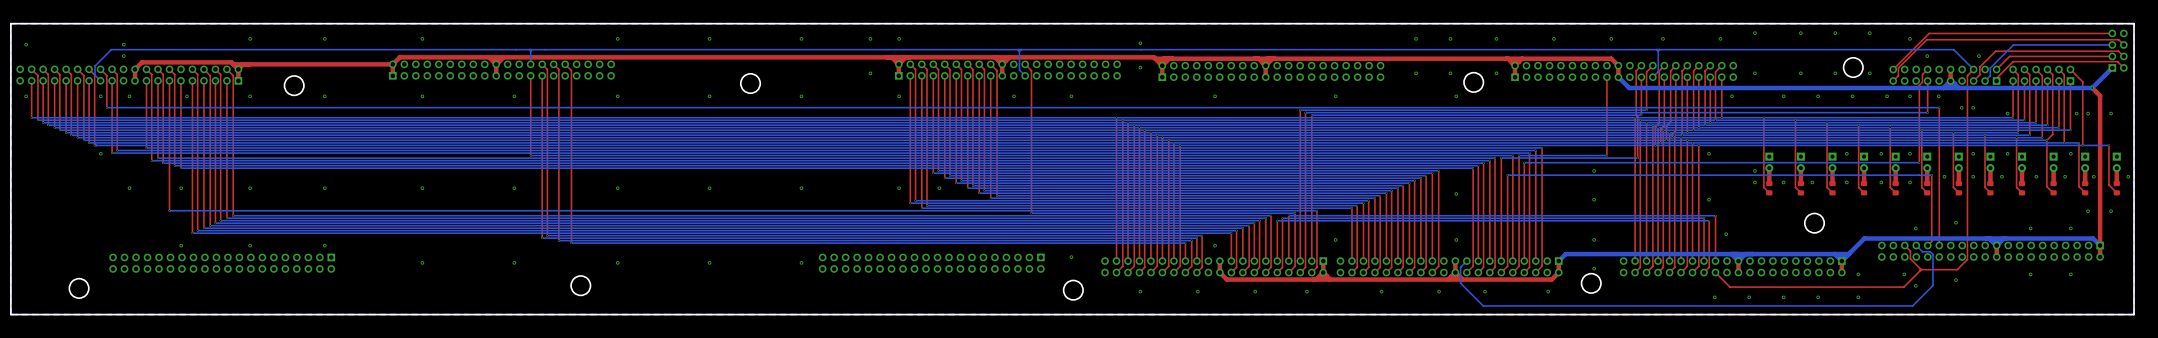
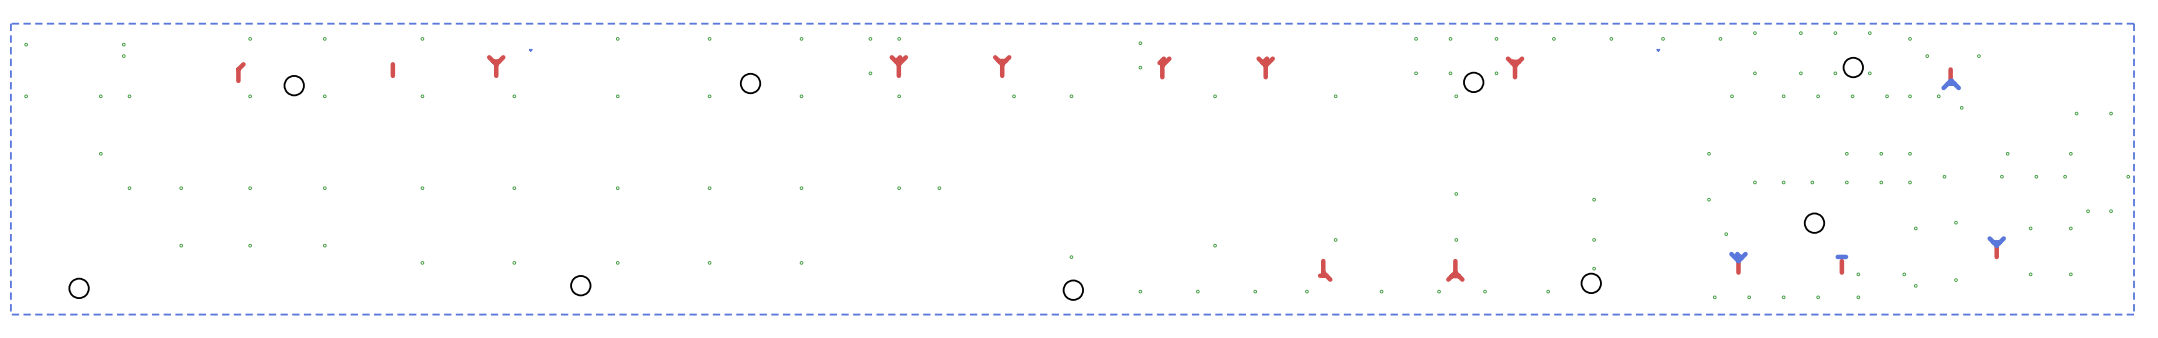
board edge: (2134, 23) (10, 23) (10, 314) (2134, 314) (2134, 23) -> none
top track: (2112, 33) (1929, 33) (1893, 69) -> none
bottom track: (2112, 44) (2013, 44) (1990, 68) (1990, 75) (1985, 80) -> none
top track: (2123, 44) (2118, 39) (1926, 39) (1898, 68) (1898, 75) (1893, 80) -> none
bottom track: (530, 49) (530, 64) -> none
bottom track: (1019, 49) (1019, 70) (1025, 75) -> none
bottom track: (1658, 49) (1658, 71) (1652, 77) -> none
part: (2118, 50) -> none
top track: (2112, 56) (2009, 56) (1996, 69) -> none
top track: (2123, 56) (2118, 51) (1995, 51) (1979, 67) (1979, 74) (1973, 80) -> none
top track: (1155, 58) (1611, 58) (1618, 65) (1618, 77) -> none
top track: (233, 64) (392, 64) (399, 57) (1153, 57) (1162, 65) -> none
top track: (542, 64) (547, 69) (547, 235) -> none
top track: (553, 64) (558, 69) (558, 240) -> none
top track: (565, 64) (571, 70) (571, 243) -> none
top track: (910, 64) (915, 69) (915, 200) -> none
top track: (921, 64) (927, 69) (927, 205) -> none
top track: (933, 64) (938, 69) (938, 170) -> none
top track: (944, 64) (949, 69) (949, 175) -> none
top track: (956, 64) (961, 69) (961, 180) -> none
top track: (967, 64) (972, 69) (972, 185) -> none
top track: (979, 64) (984, 69) (984, 190) -> none
top track: (990, 64) (997, 70) (997, 195) -> none
top track: (1025, 64) (1031, 70) (1031, 213) -> none
top track: (1641, 65) (1636, 70) (1637, 158) -> none
top track: (1652, 65) (1646, 71) (1646, 110) -> none
top track: (1664, 65) (1659, 70) (1659, 123) (1655, 126) (1655, 145) -> none
top track: (1675, 65) (1670, 70) (1670, 121) (1666, 126) (1666, 140) -> none
top track: (1687, 65) (1682, 70) (1682, 135) -> none
top track: (1698, 65) (1693, 70) (1693, 130) -> none
top track: (1710, 65) (1705, 70) (1705, 125) -> none
top track: (1721, 65) (1715, 71) (1715, 120) -> none
bottom track: (2112, 67) (2092, 88) (1629, 88) (1618, 77) -> none
top track: (2123, 67) (2117, 61) (2013, 61) (1996, 78) (1996, 80) -> none
top track: (31, 69) (37, 75) (37, 120) -> none
top track: (43, 69) (48, 74) (48, 125) -> none
top track: (54, 69) (59, 74) (59, 130) -> none
top track: (66, 69) (71, 74) (71, 135) -> none
top track: (77, 69) (83, 75) (83, 140) -> none
top track: (89, 69) (94, 74) (94, 145) -> none
top track: (100, 69) (106, 75) (106, 107) -> none
top track: (112, 69) (117, 74) (117, 150) -> none
top track: (146, 69) (151, 74) (151, 160) -> none
top track: (158, 69) (163, 74) (163, 163) -> none
top track: (169, 69) (174, 74) (174, 165) -> none
top track: (192, 69) (197, 74) (197, 230) -> none
top track: (203, 69) (210, 75) (210, 225) -> none
top track: (215, 69) (220, 74) (220, 220) -> none
top track: (226, 69) (233, 75) (233, 215) -> none
top track: (238, 69) (231, 62) (142, 62) (135, 69) (135, 80) -> none
top track: (1927, 69) (1922, 74) (1922, 82) (1919, 85) (1919, 162) -> none
top track: (1973, 69) (1967, 75) (1967, 259) (1957, 269) (1921, 269) -> none
bottom track: (1973, 69) (1953, 49) (111, 49) (95, 66) (95, 75) (100, 80) -> none
top track: (2013, 69) (2018, 74) (2018, 132) -> none
top track: (2024, 69) (2029, 74) (2029, 135) -> none
top track: (2036, 69) (2042, 75) (2042, 137) -> none
top track: (2047, 69) (2052, 74) (2052, 134) (2046, 140) (2046, 186) (2053, 192) -> none
top track: (2058, 69) (2064, 74) (2064, 142) -> none
top track: (2070, 69) (2082, 81) (2082, 145) -> none
part: (501, 70) -> none
part: (1007, 70) -> none
part: (1271, 71) -> none
part: (1624, 71) -> none
part: (129, 75) -> none
top track: (530, 75) (530, 155) -> none
top track: (542, 75) (542, 238) -> none
top track: (910, 75) (910, 203) -> none
top track: (921, 75) (921, 208) -> none
top track: (933, 75) (933, 173) -> none
top track: (944, 75) (944, 178) -> none
top track: (956, 75) (956, 183) -> none
top track: (967, 75) (967, 188) -> none
top track: (979, 75) (979, 193) -> none
top track: (990, 75) (990, 198) -> none
part: (1944, 75) -> none
part: (2041, 75) -> none
top track: (1606, 77) (1606, 155) -> none
top track: (1641, 77) (1641, 115) -> none
top track: (1664, 77) (1664, 125) (1660, 129) (1660, 142) -> none
top track: (1675, 77) (1675, 130) (1672, 134) (1672, 137) -> none
top track: (1687, 77) (1687, 132) -> none
top track: (1698, 77) (1698, 127) -> none
top track: (1710, 77) (1710, 122) -> none
top track: (1721, 77) (1721, 117) -> none
top track: (31, 80) (31, 117) -> none
top track: (43, 80) (43, 122) -> none
top track: (54, 80) (54, 127) -> none
top track: (66, 80) (66, 132) -> none
top track: (77, 80) (77, 137) -> none
top track: (89, 80) (89, 142) -> none
top track: (112, 80) (112, 153) -> none
top track: (146, 80) (146, 147) -> none
top track: (158, 80) (158, 158) -> none
top track: (169, 80) (169, 210) -> none
top track: (180, 80) (180, 168) -> none
top track: (192, 80) (192, 233) -> none
top track: (203, 80) (203, 228) -> none
top track: (215, 80) (215, 223) -> none
top track: (226, 80) (226, 218) -> none
top track: (1927, 80) (1927, 112) -> none
top track: (2013, 80) (2013, 117) -> none
top track: (2024, 80) (2024, 120) -> none
top track: (2036, 80) (2036, 122) -> none
top track: (2047, 80) (2047, 125) -> none
top track: (2058, 80) (2058, 127) -> none
top track: (2070, 80) (2070, 130) -> none
top track: (2092, 88) (2100, 95) (2100, 257) -> none
via: (2092, 88) -> none
via: (186, 96) -> none
via: (106, 107) -> none
top track: (1939, 107) (1939, 245) -> none
bottom track: (1939, 107) (106, 107) -> none
via: (1939, 107) -> none
via: (1973, 107) -> none
top track: (1300, 110) (1300, 261) -> none
via: (1300, 110) -> none
bottom track: (1646, 110) (1300, 110) -> none
via: (1646, 110) -> none
top track: (1305, 112) (1305, 267) (1300, 272) -> none
via: (1305, 112) -> none
bottom track: (1927, 112) (1305, 112) -> none
via: (1927, 112) -> none
via: (2007, 113) -> none
via: (2088, 113) -> none
top track: (1311, 115) (1311, 261) -> none
via: (1311, 115) -> none
bottom track: (1641, 115) (1311, 115) -> none
via: (1641, 115) -> none
via: (31, 117) -> none
top track: (1116, 117) (1116, 261) -> none
via: (1116, 117) -> none
top track: (1635, 117) (1635, 261) -> none
via: (1635, 117) -> none
via: (1721, 117) -> none
top track: (1763, 117) (1763, 187) (1769, 192) -> none
via: (1763, 117) -> none
bottom track: (2013, 117) (31, 117) -> none
via: (2013, 117) -> none
via: (37, 120) -> none
top track: (1122, 120) (1122, 266) (1116, 272) -> none
via: (1122, 120) -> none
top track: (1640, 120) (1640, 267) (1635, 272) -> none
via: (1640, 120) -> none
via: (1715, 120) -> none
top track: (1795, 120) (1795, 187) (1800, 192) -> none
via: (1795, 120) -> none
bottom track: (2024, 120) (37, 120) -> none
via: (2024, 120) -> none
via: (43, 122) -> none
top track: (1127, 122) (1127, 261) -> none
via: (1127, 122) -> none
top track: (1646, 122) (1646, 261) -> none
via: (1646, 122) -> none
via: (1710, 122) -> none
top track: (1827, 122) (1827, 187) (1832, 192) -> none
via: (1827, 122) -> none
bottom track: (2036, 122) (43, 122) -> none
via: (2036, 122) -> none
via: (48, 125) -> none
top track: (1134, 125) (1134, 266) (1127, 272) -> none
via: (1134, 125) -> none
top track: (1652, 125) (1652, 266) (1646, 272) -> none
via: (1652, 125) -> none
via: (1705, 125) -> none
top track: (1858, 125) (1858, 187) (1864, 192) -> none
via: (1858, 125) -> none
bottom track: (2047, 125) (48, 125) -> none
via: (2047, 125) -> none
via: (54, 127) -> none
top track: (1139, 127) (1139, 261) -> none
via: (1139, 127) -> none
top track: (1658, 127) (1658, 261) -> none
via: (1658, 127) -> none
via: (1698, 127) -> none
top track: (1890, 127) (1890, 187) (1895, 192) -> none
via: (1890, 127) -> none
bottom track: (2058, 127) (54, 127) -> none
via: (2058, 127) -> none
via: (59, 130) -> none
top track: (1144, 130) (1144, 267) (1139, 272) -> none
via: (1144, 130) -> none
top track: (1663, 130) (1663, 267) (1658, 272) -> none
via: (1663, 130) -> none
via: (1693, 130) -> none
top track: (1921, 130) (1921, 187) (1927, 192) -> none
via: (1921, 130) -> none
bottom track: (2070, 130) (59, 130) -> none
via: (2070, 130) -> none
via: (66, 132) -> none
top track: (1150, 132) (1150, 261) -> none
via: (1150, 132) -> none
top track: (1669, 132) (1669, 261) -> none
via: (1669, 132) -> none
via: (1687, 132) -> none
top track: (1953, 132) (1953, 187) (1958, 192) -> none
via: (1953, 132) -> none
bottom track: (2018, 132) (66, 132) -> none
via: (2018, 132) -> none
via: (71, 135) -> none
top track: (1157, 135) (1157, 266) (1150, 272) -> none
via: (1157, 135) -> none
top track: (1674, 135) (1674, 267) (1669, 272) -> none
via: (1674, 135) -> none
via: (1682, 135) -> none
top track: (1985, 135) (1985, 187) (1990, 192) -> none
via: (1985, 135) -> none
bottom track: (2029, 135) (71, 135) -> none
via: (2029, 135) -> none
via: (77, 137) -> none
top track: (1162, 137) (1162, 261) -> none
via: (1162, 137) -> none
via: (1672, 137) -> none
top track: (1681, 137) (1681, 261) -> none
via: (1681, 137) -> none
top track: (2016, 137) (2016, 187) (2022, 192) -> none
via: (2016, 137) -> none
bottom track: (2042, 137) (77, 137) -> none
via: (2042, 137) -> none
via: (83, 140) -> none
top track: (1168, 140) (1168, 266) (1162, 272) -> none
via: (1168, 140) -> none
via: (1666, 140) -> none
top track: (1687, 140) (1687, 266) (1681, 272) -> none
via: (1687, 140) -> none
bottom track: (2046, 140) (83, 140) -> none
via: (2046, 140) -> none
via: (89, 142) -> none
top track: (1173, 142) (1173, 261) -> none
via: (1173, 142) -> none
via: (1660, 142) -> none
top track: (1692, 142) (1692, 261) -> none
via: (1692, 142) -> none
via: (2064, 142) -> none
top track: (2078, 142) (2078, 186) (2085, 192) -> none
bottom track: (2078, 142) (89, 142) -> none
via: (2078, 142) -> none
via: (94, 145) -> none
top track: (1180, 145) (1180, 266) (1173, 272) -> none
via: (1180, 145) -> none
via: (1655, 145) -> none
top track: (1698, 145) (1698, 266) (1692, 272) -> none
via: (1698, 145) -> none
via: (2082, 145) -> none
top track: (2109, 145) (2109, 185) (2116, 192) -> none
bottom track: (2109, 145) (94, 145) -> none
via: (2109, 145) -> none
via: (146, 147) -> none
top track: (1542, 147) (1542, 266) (1535, 272) -> none
bottom track: (1542, 147) (146, 147) -> none
via: (1542, 147) -> none
via: (117, 150) -> none
top track: (1535, 150) (1535, 261) -> none
bottom track: (1535, 150) (117, 150) -> none
via: (1535, 150) -> none
via: (112, 153) -> none
top track: (1529, 153) (1529, 267) (1524, 272) -> none
bottom track: (1529, 153) (112, 153) -> none
via: (1529, 153) -> none
via: (1973, 153) -> none
via: (530, 155) -> none
top track: (1512, 155) (1512, 261) -> none
bottom track: (1512, 155) (530, 155) -> none
via: (1512, 155) -> none
top track: (1519, 155) (1519, 266) (1512, 272) -> none
via: (1519, 155) -> none
bottom track: (1606, 155) (1519, 155) -> none
via: (1606, 155) -> none
via: (158, 158) -> none
top track: (1495, 158) (1495, 267) (1489, 272) -> none
bottom track: (1495, 158) (158, 158) -> none
via: (1495, 158) -> none
top track: (1501, 158) (1501, 261) -> none
via: (1501, 158) -> none
bottom track: (1637, 158) (1501, 158) -> none
via: (1637, 158) -> none
via: (151, 160) -> none
top track: (1489, 160) (1489, 261) -> none
bottom track: (1489, 160) (151, 160) -> none
via: (1489, 160) -> none
top track: (1524, 162) (1524, 261) -> none
via: (1524, 162) -> none
part: (1769, 162) -> none
part: (1800, 162) -> none
part: (1832, 162) -> none
part: (1864, 162) -> none
part: (1895, 162) -> none
bottom track: (1919, 162) (1524, 162) -> none
via: (1919, 162) -> none
part: (1927, 162) -> none
part: (1958, 162) -> none
part: (1990, 162) -> none
part: (2022, 162) -> none
part: (2053, 162) -> none
part: (2085, 162) -> none
part: (2116, 162) -> none
via: (163, 163) -> none
top track: (1483, 163) (1483, 267) (1478, 272) -> none
bottom track: (1483, 163) (163, 163) -> none
via: (1483, 163) -> none
via: (174, 165) -> none
top track: (1478, 165) (1478, 261) -> none
bottom track: (1478, 165) (174, 165) -> none
via: (1478, 165) -> none
via: (180, 168) -> none
top track: (1473, 168) (1473, 266) (1466, 272) -> none
bottom track: (1473, 168) (180, 168) -> none
via: (1473, 168) -> none
top track: (1769, 168) (1769, 183) -> none
top track: (1800, 168) (1800, 183) -> none
top track: (1832, 168) (1832, 183) -> none
top track: (1864, 168) (1864, 183) -> none
top track: (1895, 168) (1895, 183) -> none
top track: (1927, 168) (1927, 183) -> none
top track: (1958, 168) (1958, 183) -> none
top track: (1990, 168) (1990, 183) -> none
top track: (2022, 168) (2022, 183) -> none
top track: (2053, 168) (2053, 183) -> none
top track: (2085, 168) (2085, 183) -> none
top track: (2116, 168) (2116, 183) -> none
via: (938, 170) -> none
top track: (1438, 170) (1438, 266) (1432, 272) -> none
bottom track: (1438, 170) (938, 170) -> none
via: (1438, 170) -> none
via: (1594, 170) -> none
via: (1754, 170) -> none
via: (933, 173) -> none
top track: (1432, 173) (1432, 261) -> none
bottom track: (1432, 173) (933, 173) -> none
via: (1432, 173) -> none
via: (949, 175) -> none
top track: (1426, 175) (1426, 267) (1420, 272) -> none
bottom track: (1426, 175) (949, 175) -> none
via: (1426, 175) -> none
top track: (1507, 175) (1507, 266) (1501, 272) -> none
via: (1507, 175) -> none
top track: (1931, 175) (1931, 241) (1927, 245) -> none
bottom track: (1931, 175) (1507, 175) -> none
via: (1931, 175) -> none
via: (1973, 176) -> none
via: (2093, 176) -> none
via: (944, 178) -> none
top track: (1420, 178) (1420, 261) -> none
bottom track: (1420, 178) (944, 178) -> none
via: (1420, 178) -> none
via: (961, 180) -> none
top track: (1414, 180) (1414, 267) (1409, 272) -> none
bottom track: (1414, 180) (961, 180) -> none
via: (1414, 180) -> none
via: (956, 183) -> none
top track: (1409, 183) (1409, 261) -> none
bottom track: (1409, 183) (956, 183) -> none
via: (1409, 183) -> none
via: (972, 185) -> none
top track: (1403, 185) (1403, 267) (1397, 272) -> none
bottom track: (1403, 185) (972, 185) -> none
via: (1403, 185) -> none
via: (967, 188) -> none
top track: (1397, 188) (1397, 261) -> none
bottom track: (1397, 188) (967, 188) -> none
via: (1397, 188) -> none
part: (1769, 188) -> none
part: (1800, 188) -> none
part: (1832, 188) -> none
part: (1864, 188) -> none
part: (1895, 188) -> none
part: (1927, 188) -> none
part: (1958, 188) -> none
part: (1990, 188) -> none
part: (2022, 188) -> none
part: (2053, 188) -> none
part: (2085, 188) -> none
part: (2116, 188) -> none
via: (984, 190) -> none
top track: (1391, 190) (1391, 267) (1386, 272) -> none
bottom track: (1391, 190) (984, 190) -> none
via: (1391, 190) -> none
via: (979, 193) -> none
top track: (1386, 193) (1386, 261) -> none
bottom track: (1386, 193) (979, 193) -> none
via: (1386, 193) -> none
via: (997, 195) -> none
top track: (1380, 195) (1380, 267) (1374, 272) -> none
bottom track: (1380, 195) (997, 195) -> none
via: (1380, 195) -> none
via: (990, 198) -> none
top track: (1374, 198) (1374, 261) -> none
bottom track: (1374, 198) (990, 198) -> none
via: (1374, 198) -> none
via: (915, 200) -> none
top track: (1368, 200) (1368, 267) (1363, 272) -> none
bottom track: (1368, 200) (915, 200) -> none
via: (1368, 200) -> none
via: (910, 203) -> none
top track: (1363, 203) (1363, 261) -> none
bottom track: (1363, 203) (910, 203) -> none
via: (1363, 203) -> none
via: (927, 205) -> none
top track: (1357, 205) (1357, 267) (1351, 272) -> none
bottom track: (1357, 205) (927, 205) -> none
via: (1357, 205) -> none
via: (921, 208) -> none
top track: (1351, 208) (1351, 261) -> none
bottom track: (1351, 208) (921, 208) -> none
via: (1351, 208) -> none
via: (169, 210) -> none
top track: (1316, 210) (1316, 267) (1311, 272) -> none
bottom track: (1316, 210) (169, 210) -> none
via: (1316, 210) -> none
via: (1031, 213) -> none
top track: (1295, 213) (1295, 266) (1288, 272) -> none
bottom track: (1295, 213) (1031, 213) -> none
via: (1295, 213) -> none
via: (233, 215) -> none
top track: (1271, 215) (1271, 267) (1265, 272) -> none
bottom track: (1271, 215) (233, 215) -> none
via: (1271, 215) -> none
top track: (1288, 215) (1288, 261) -> none
via: (1288, 215) -> none
top track: (1715, 215) (1715, 261) -> none
bottom track: (1715, 215) (1288, 215) -> none
via: (1715, 215) -> none
via: (226, 218) -> none
top track: (1265, 218) (1265, 261) -> none
bottom track: (1265, 218) (226, 218) -> none
via: (1265, 218) -> none
top track: (1282, 218) (1282, 267) (1277, 272) -> none
via: (1282, 218) -> none
top track: (1704, 218) (1704, 261) -> none
bottom track: (1704, 218) (1282, 218) -> none
via: (1704, 218) -> none
via: (220, 220) -> none
top track: (1259, 220) (1259, 267) (1254, 272) -> none
bottom track: (1259, 220) (220, 220) -> none
via: (1259, 220) -> none
top track: (1277, 220) (1277, 261) -> none
via: (1277, 220) -> none
top track: (1709, 220) (1709, 267) (1704, 272) -> none
bottom track: (1709, 220) (1277, 220) -> none
via: (1709, 220) -> none
via: (215, 223) -> none
top track: (1254, 223) (1254, 261) -> none
bottom track: (1254, 223) (215, 223) -> none
via: (1254, 223) -> none
via: (210, 225) -> none
top track: (1249, 225) (1249, 266) (1242, 272) -> none
bottom track: (1249, 225) (210, 225) -> none
via: (1249, 225) -> none
via: (203, 228) -> none
top track: (1242, 228) (1242, 261) -> none
bottom track: (1242, 228) (203, 228) -> none
via: (1242, 228) -> none
via: (197, 230) -> none
top track: (1236, 230) (1236, 267) (1231, 272) -> none
bottom track: (1236, 230) (197, 230) -> none
via: (1236, 230) -> none
via: (192, 233) -> none
top track: (1231, 233) (1231, 261) -> none
bottom track: (1231, 233) (192, 233) -> none
via: (1231, 233) -> none
via: (547, 235) -> none
top track: (1202, 235) (1202, 267) (1196, 272) -> none
bottom track: (1202, 235) (547, 235) -> none
via: (1202, 235) -> none
via: (542, 238) -> none
top track: (1196, 238) (1196, 261) -> none
bottom track: (1196, 238) (542, 238) -> none
via: (1196, 238) -> none
via: (558, 240) -> none
top track: (1191, 240) (1191, 266) (1185, 272) -> none
bottom track: (1191, 240) (558, 240) -> none
via: (1191, 240) -> none
via: (571, 243) -> none
top track: (1185, 243) (1185, 261) -> none
bottom track: (1185, 243) (571, 243) -> none
via: (1185, 243) -> none
top track: (1904, 245) (1910, 251) (1910, 258) (1921, 269) -> none
bottom track: (1916, 245) (1922, 251) (1930, 251) (1932, 254) (1932, 285) (1912, 305) (1483, 305) (1460, 283) (1460, 267) (1466, 261) -> none
bottom track: (2100, 245) (2093, 238) (1864, 238) (1841, 261) (1834, 254) -> none
part: (1990, 251) -> none
bottom track: (1848, 254) (1565, 254) (1558, 261) -> none
top track: (1558, 261) (1558, 272) (1551, 279) (1226, 279) (1219, 272) (1219, 261) -> none
part: (222, 263) -> none
part: (931, 263) -> none
part: (1214, 266) -> none
part: (1449, 266) -> none
part: (1732, 266) -> none
top track: (1921, 269) (1903, 287) (1730, 287) (1715, 272) -> none

